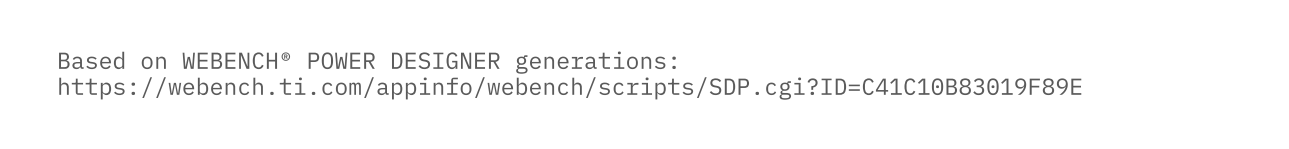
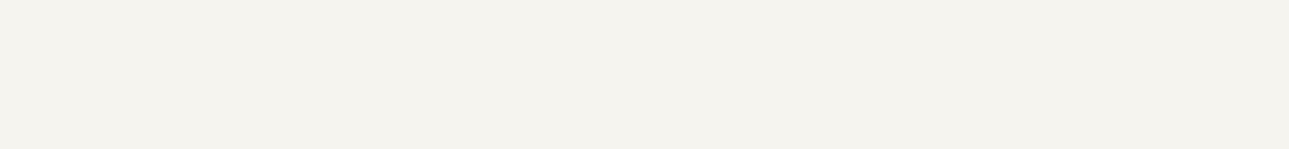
text: Based on WEBENCH® POWER DESIGNER generations: (367, 62) -> none
text: https://webench.ti.com/appinfo/webench/scripts/SDP.cgi?ID=C41C10B83019F89E (570, 88) -> none

